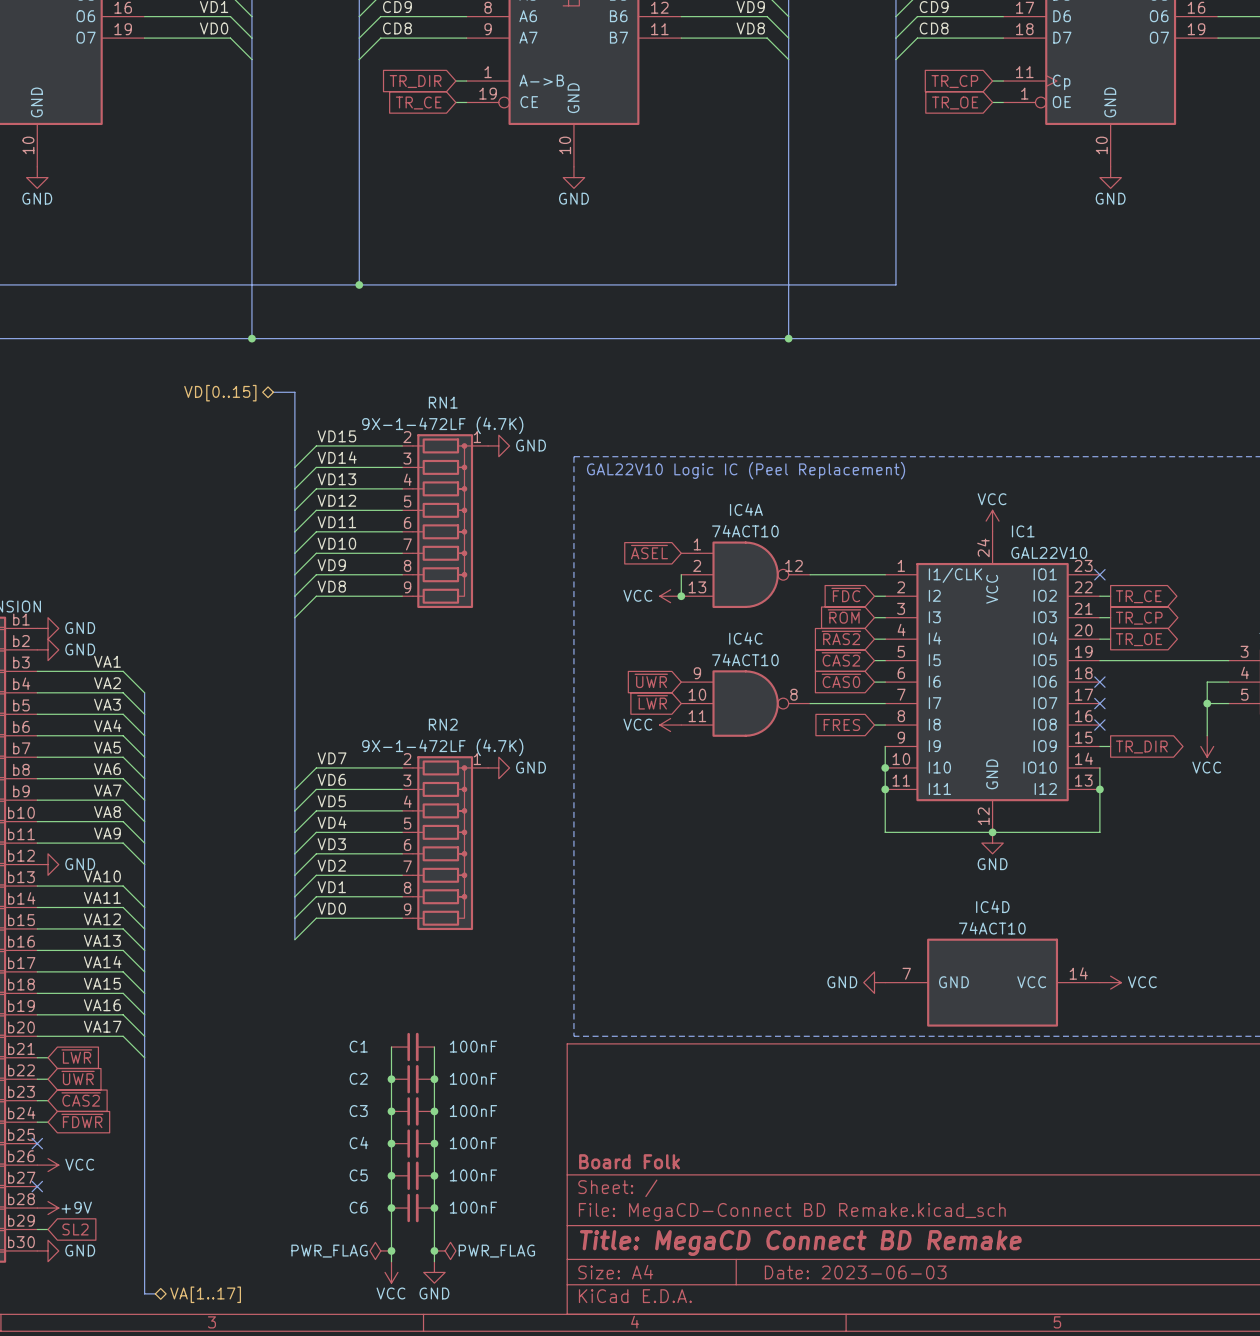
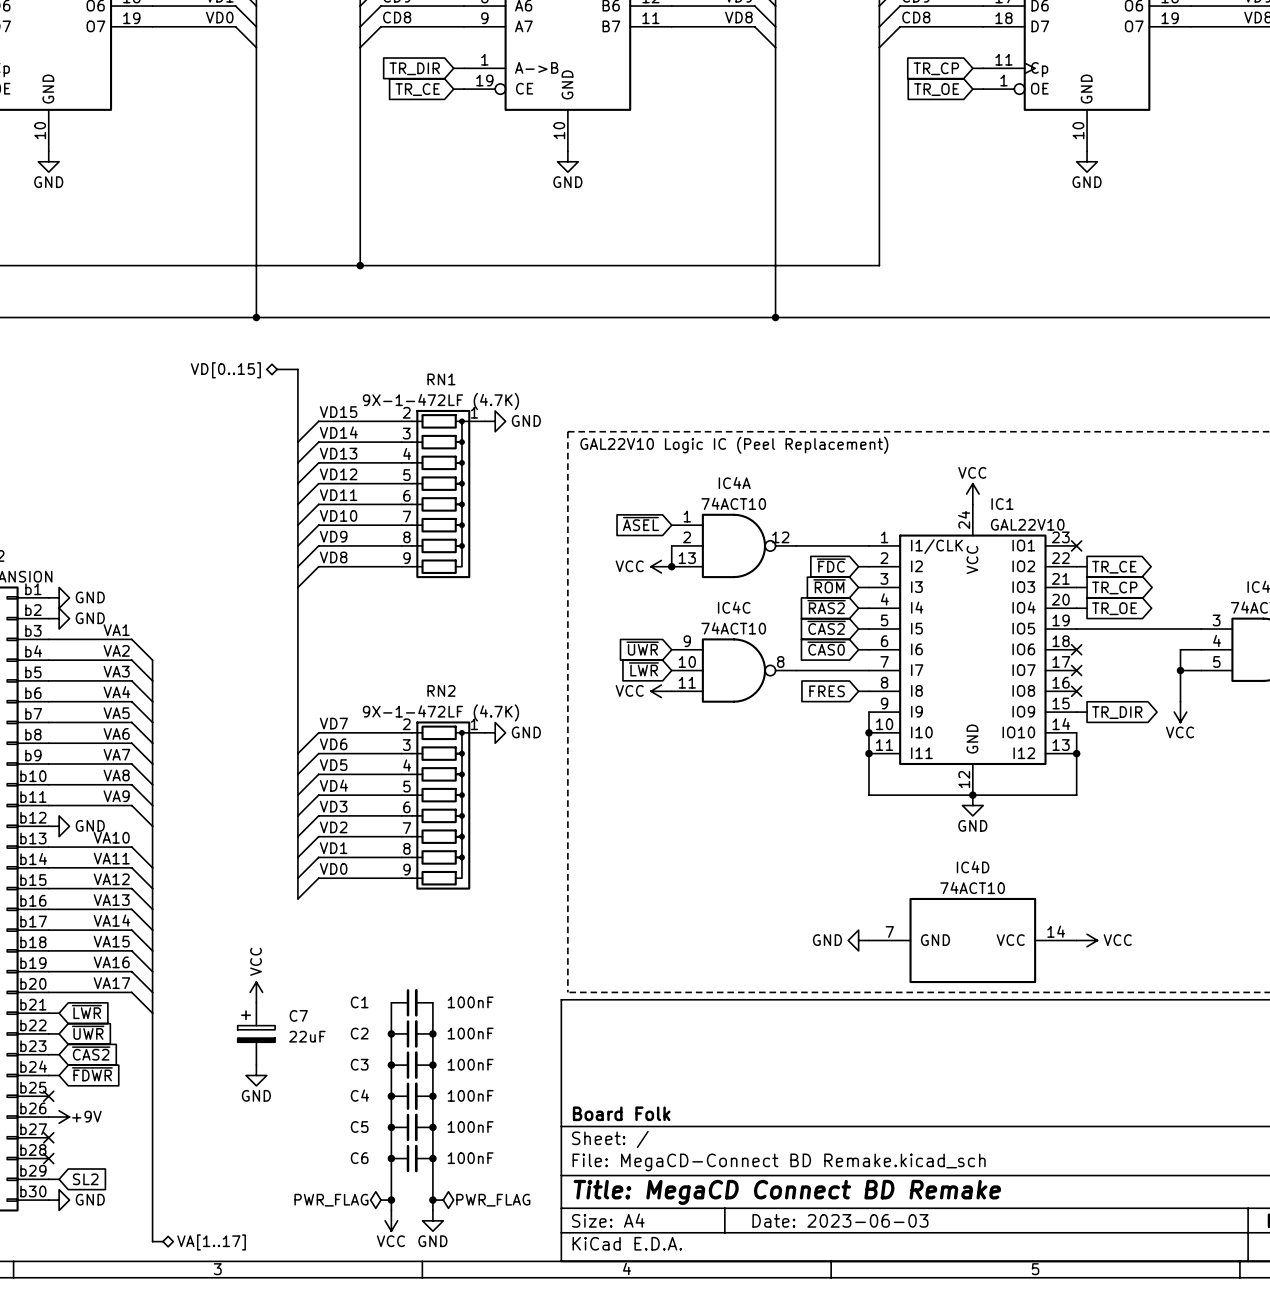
power symbol: none -> VCC (256, 992)
C7: none -> 22uF (256, 1033)
power symbol: none -> GND (256, 1075)
power symbol: VCC (48, 1165) -> +9V (59, 1117)
no-connect mark: none -> (48, 1158)
power symbol: +9V (48, 1208) -> none

